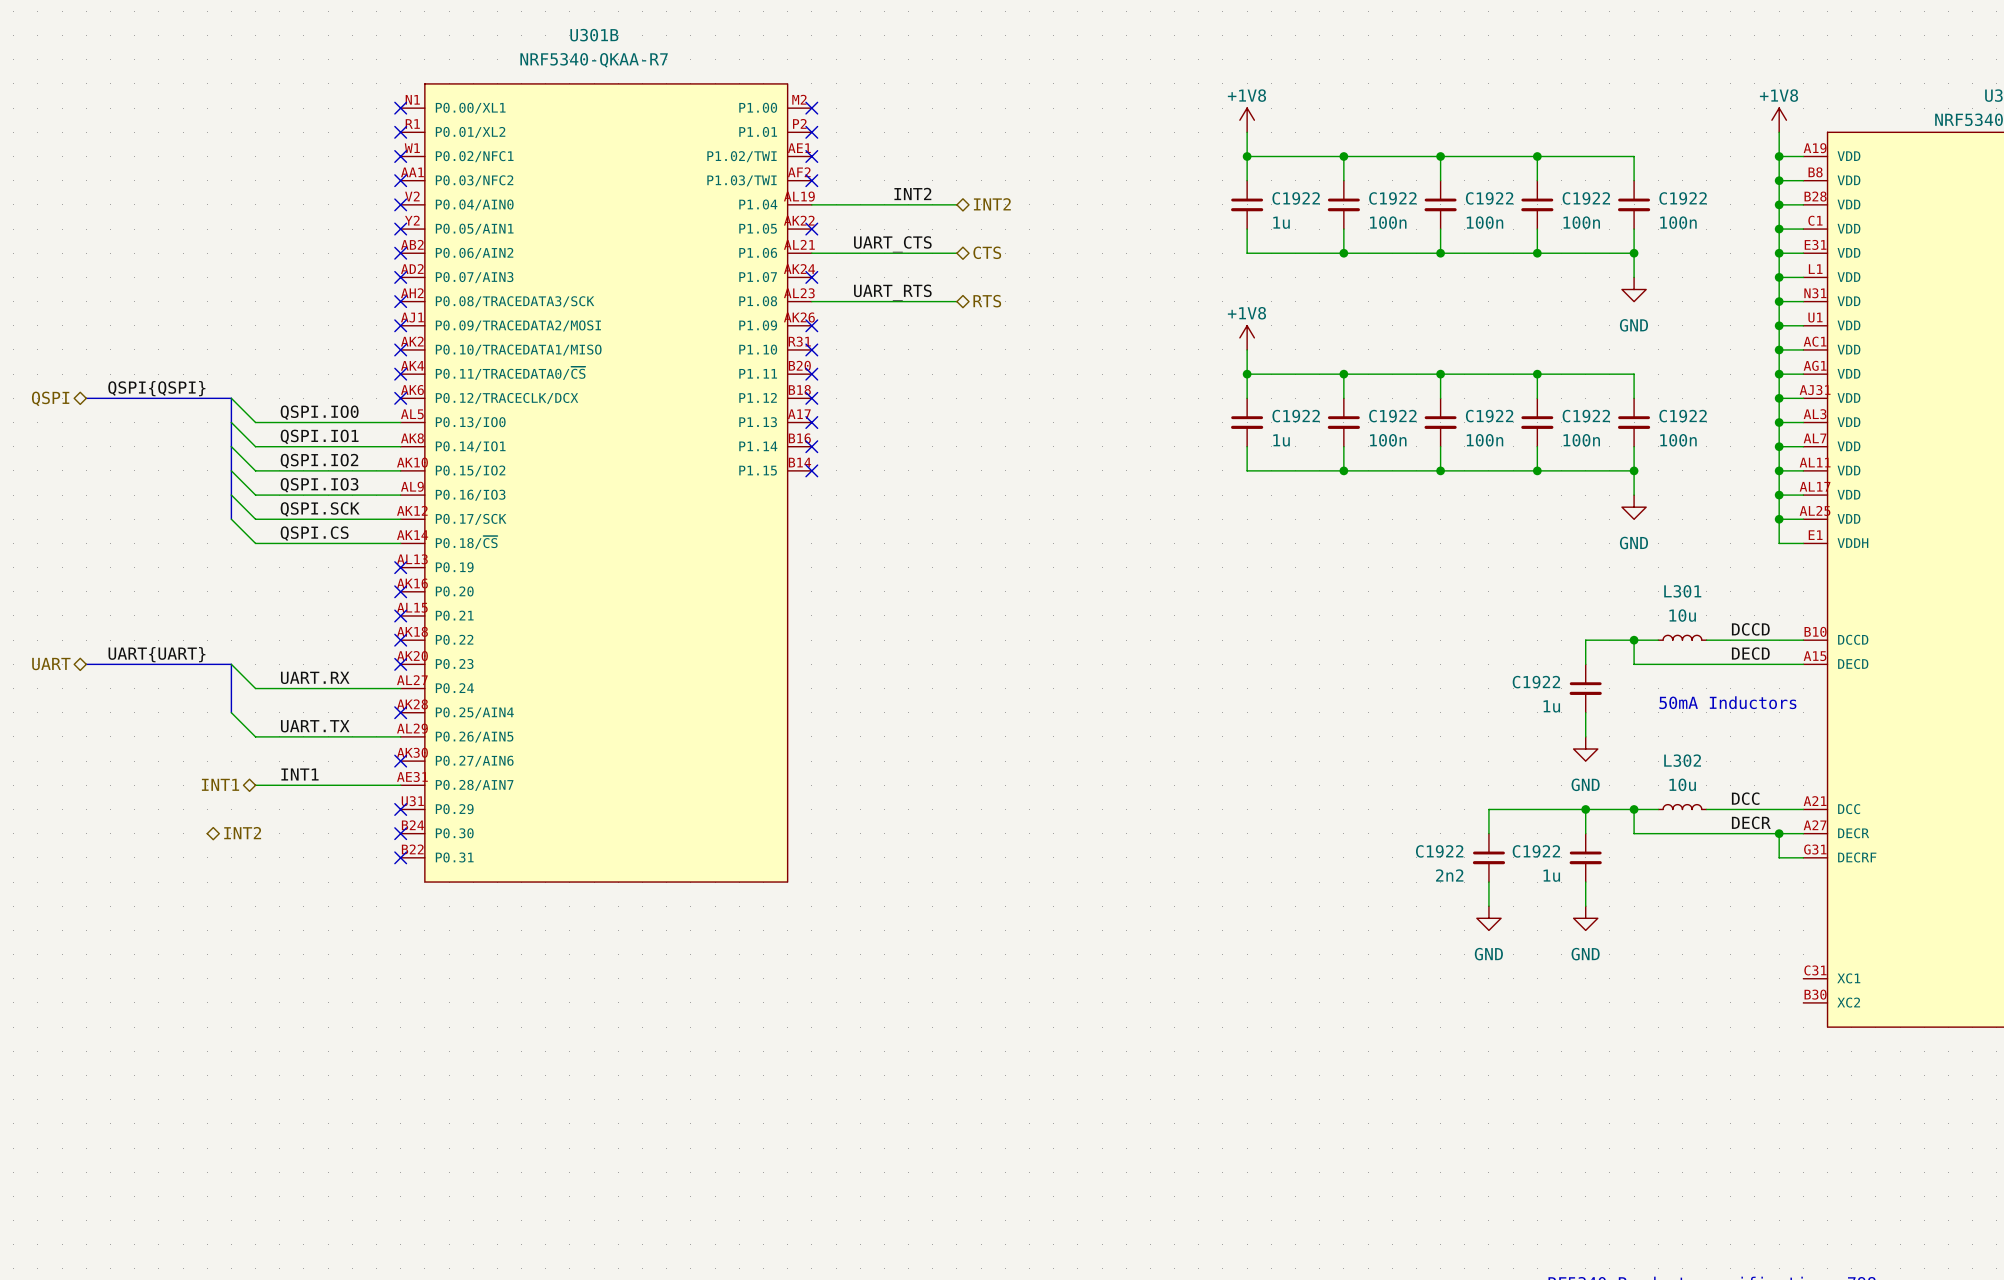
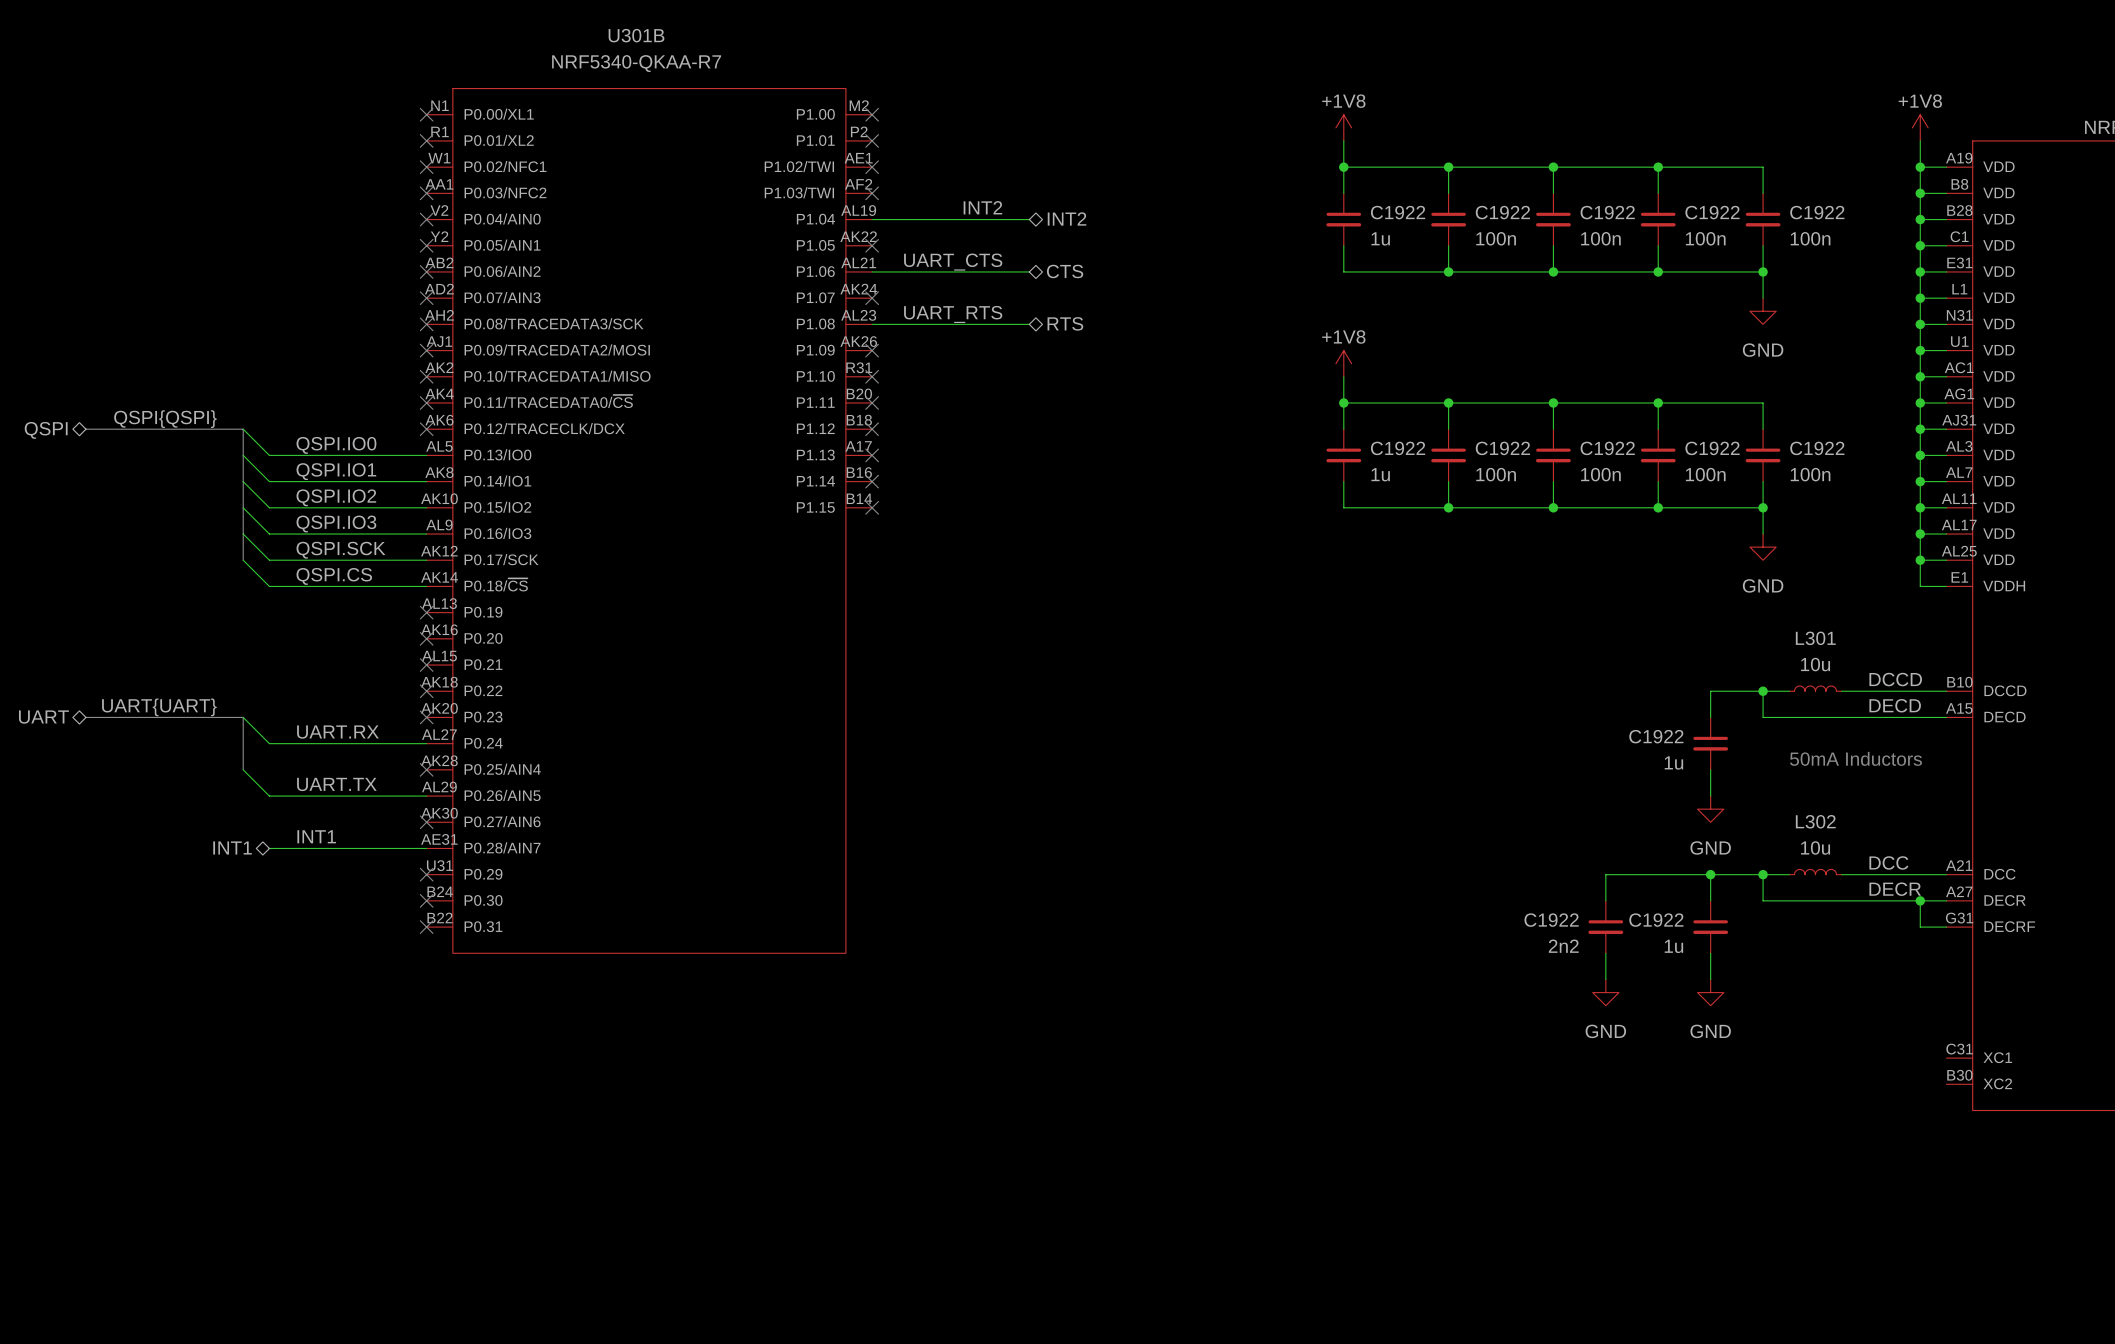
hierarchical label: INT2 (242, 833) -> none

